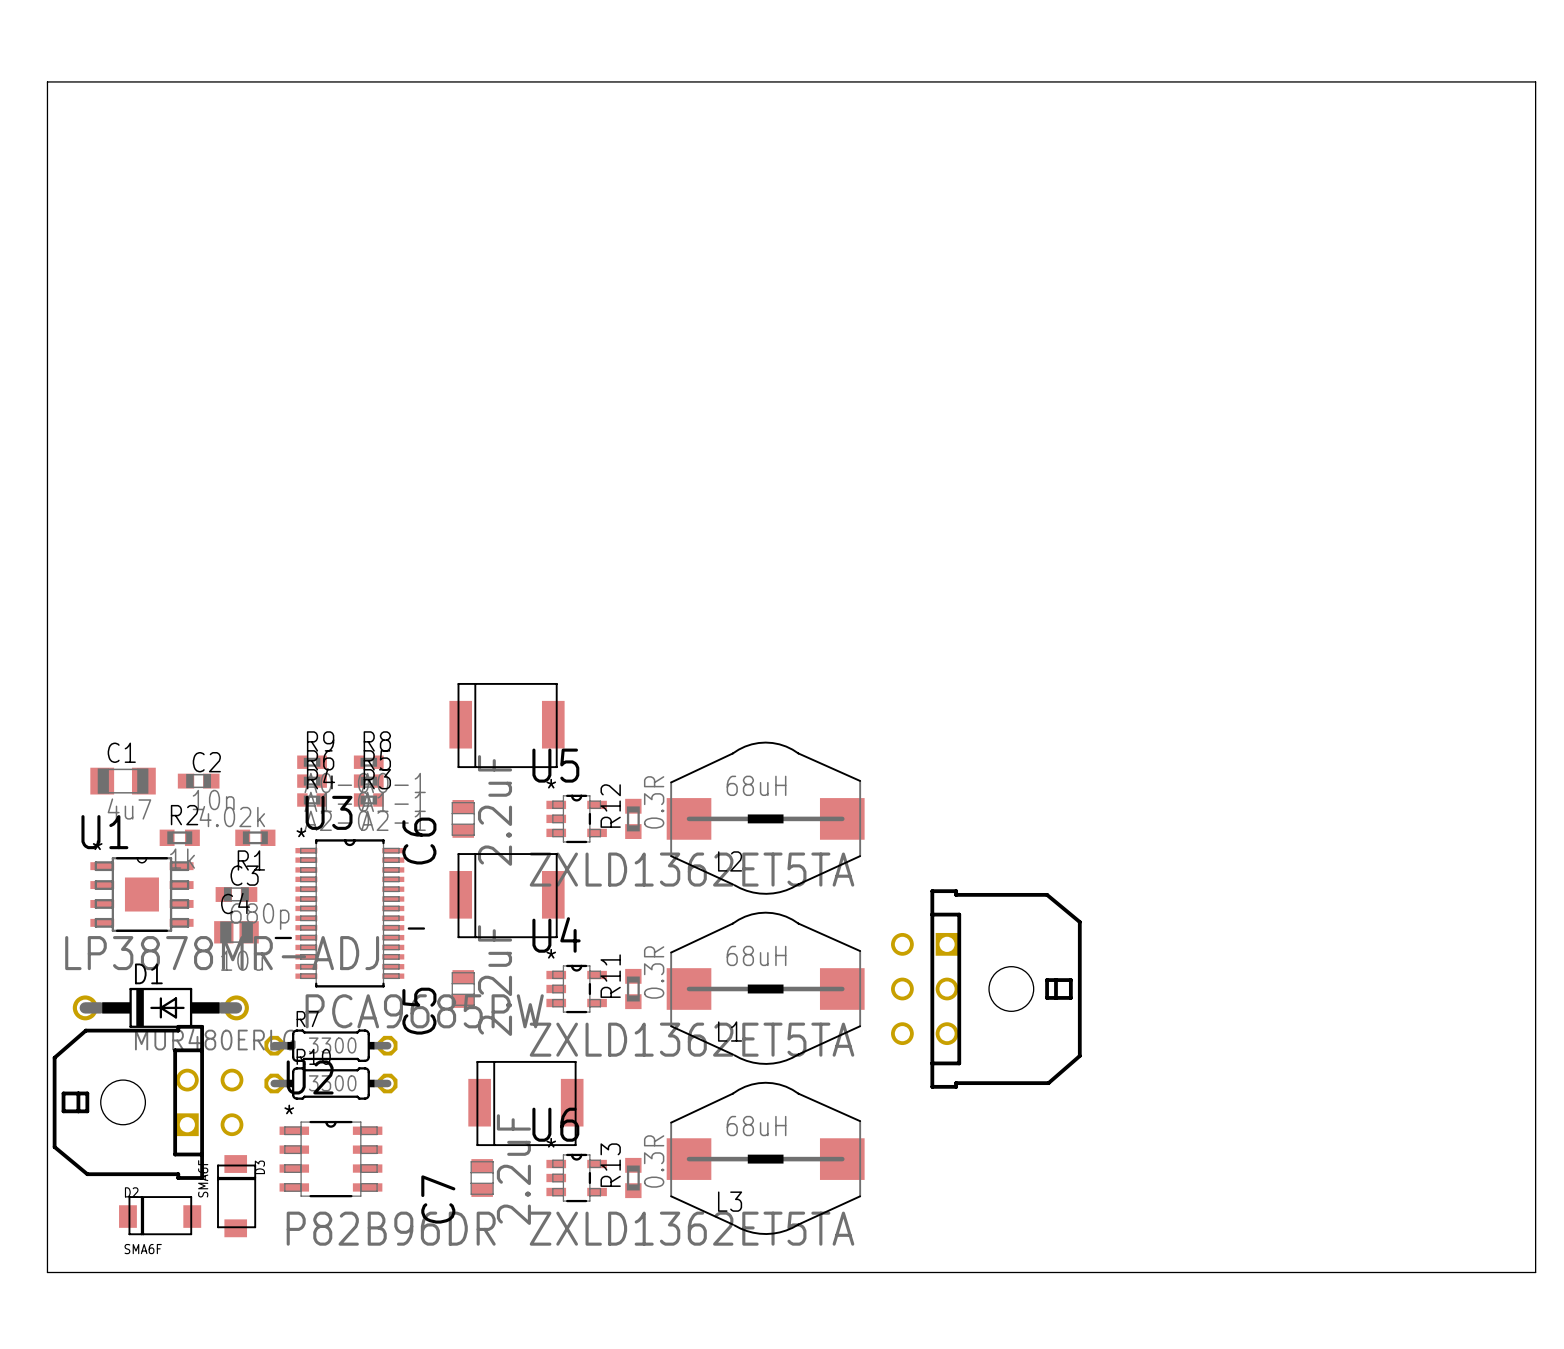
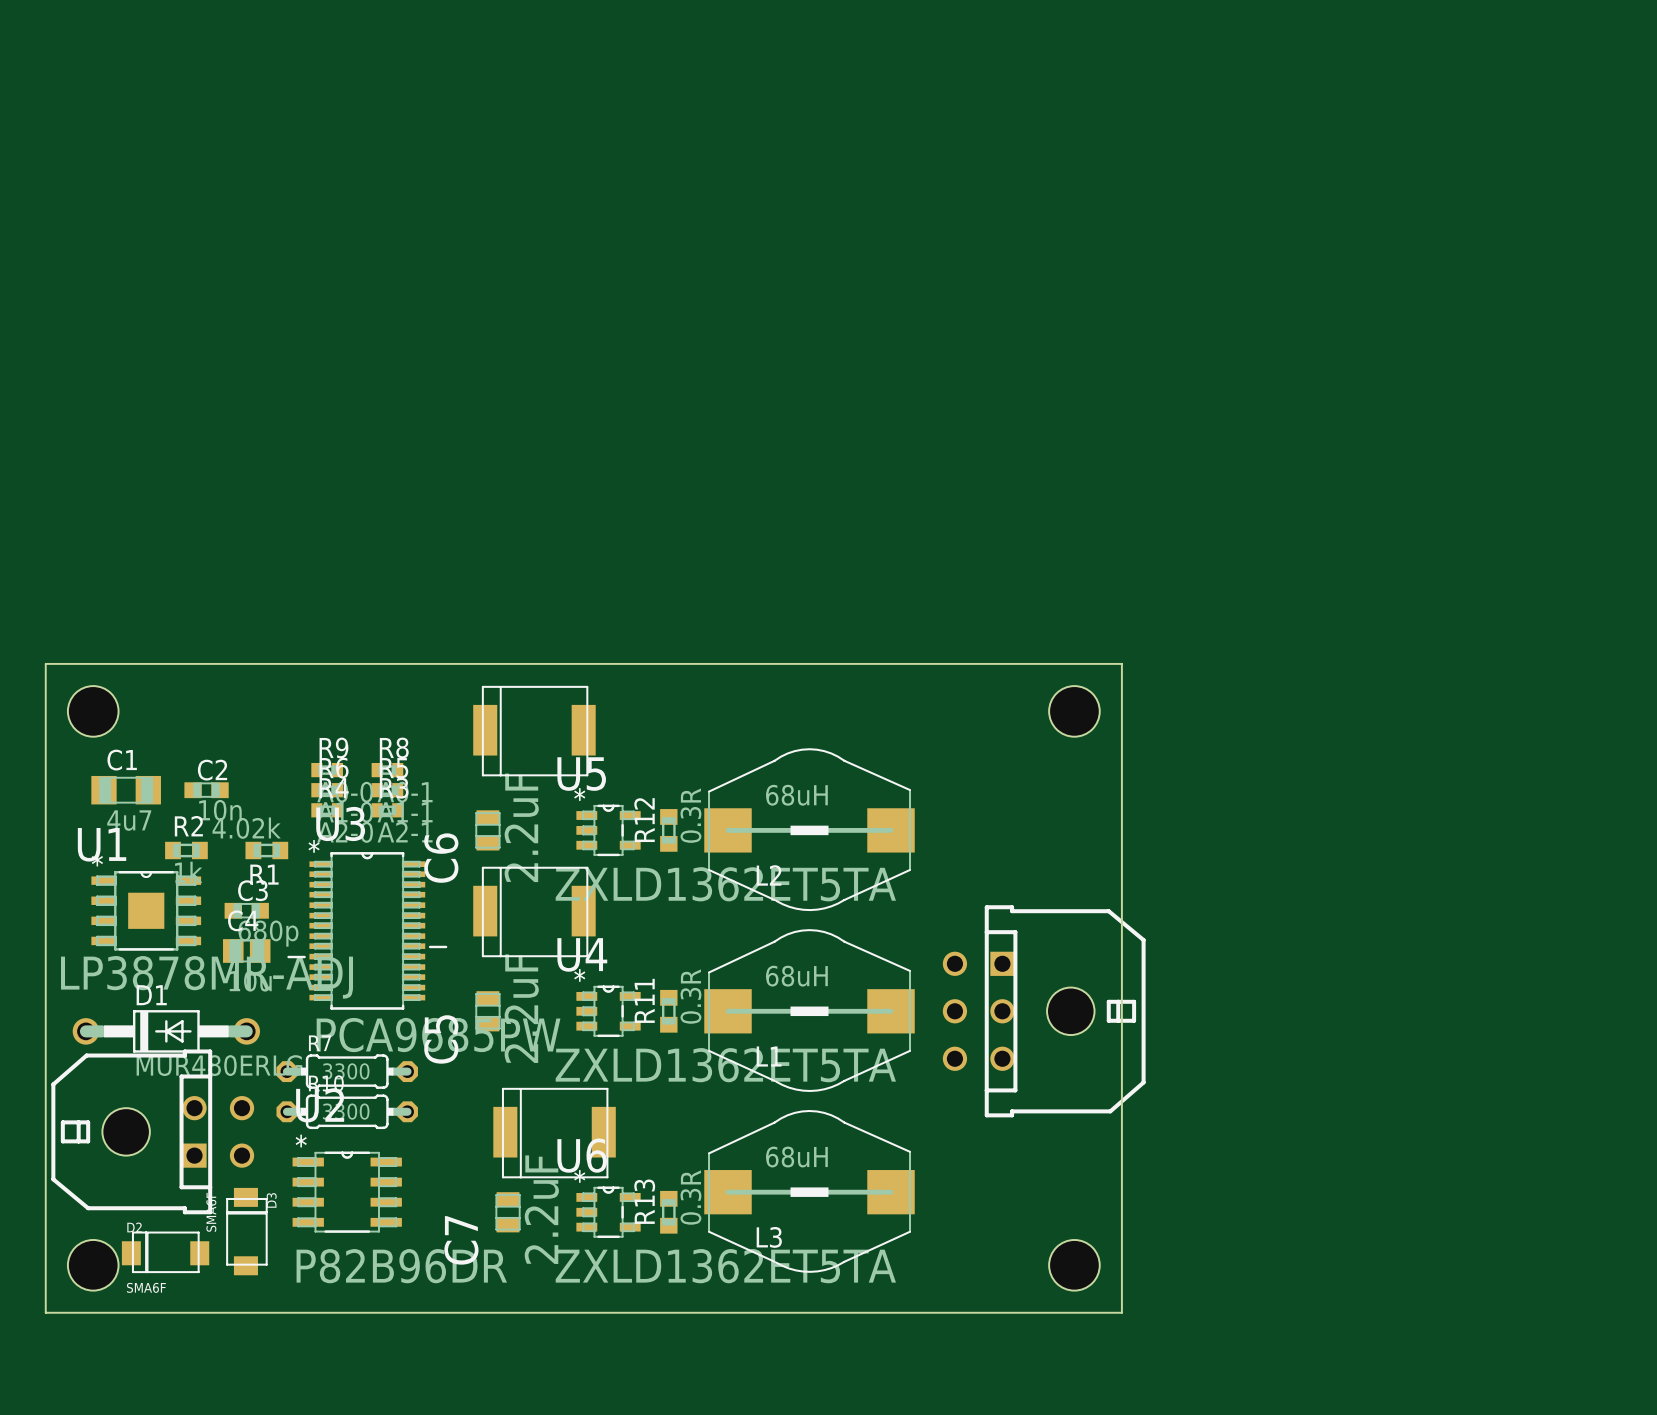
board edge: (47, 662) (47, 81) (1535, 81) (1535, 1272) (1059, 1272) -> (45, 663) (1121, 663) (1121, 1312)
hole: none -> (93, 711)
hole: none -> (1074, 711)
hole: none -> (93, 1265)
hole: none -> (1074, 1265)

